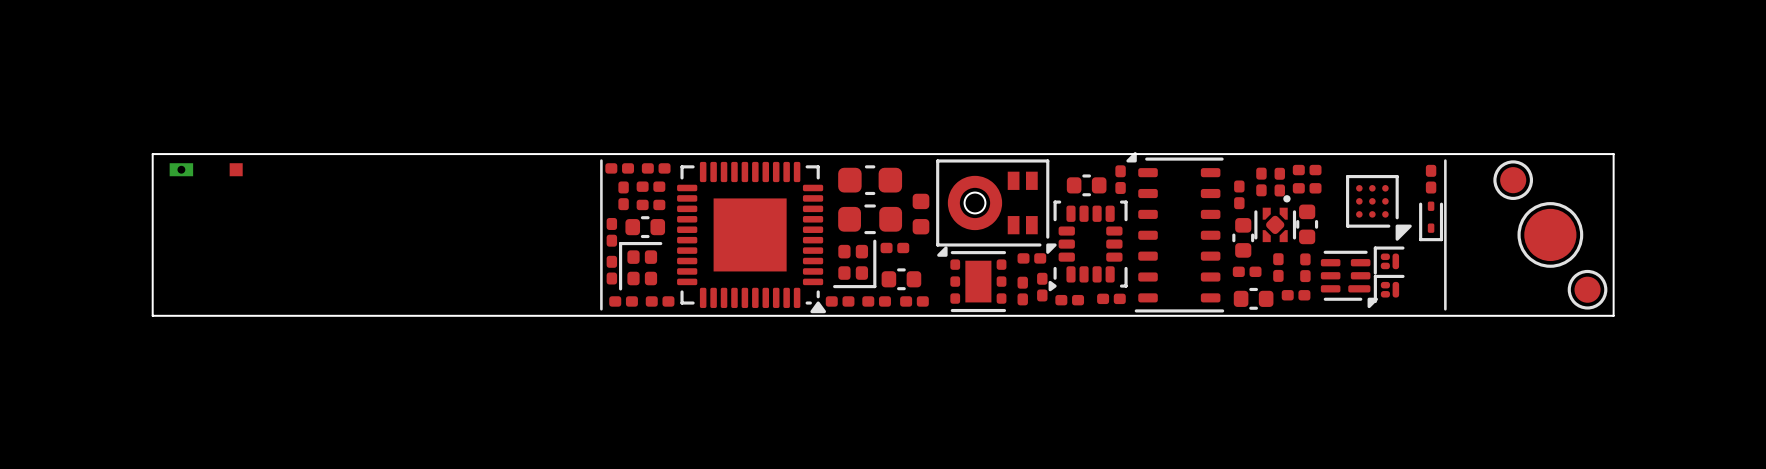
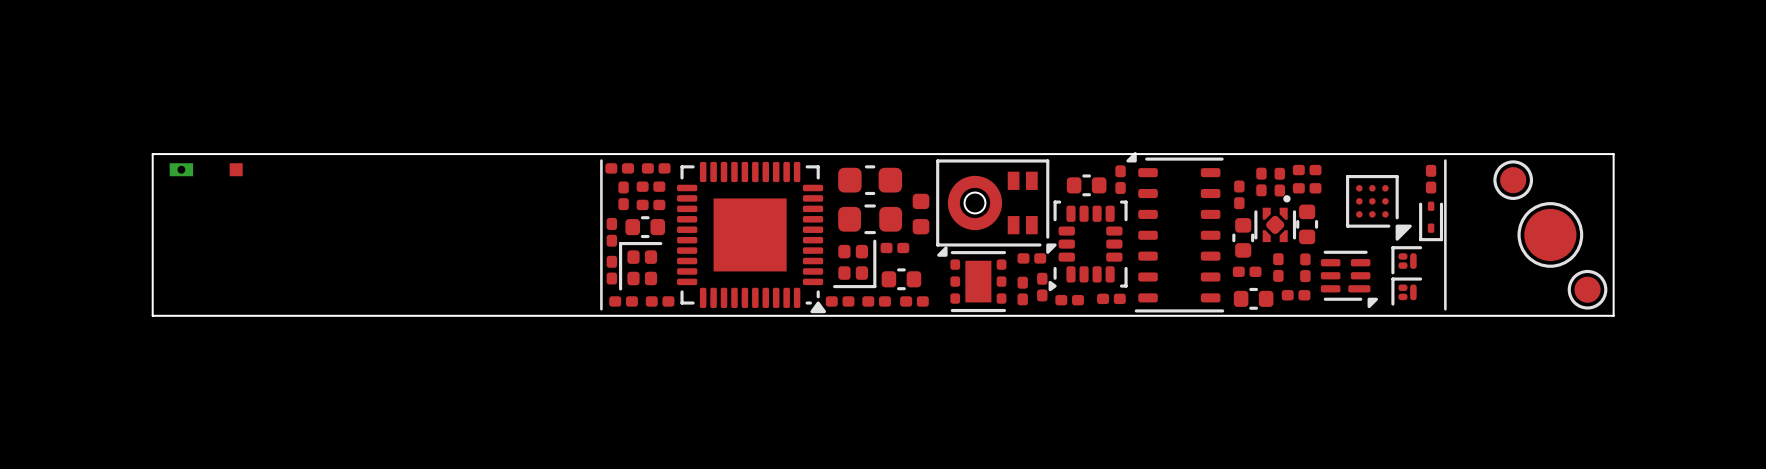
part: (1389, 260) -> none
part: none -> (1406, 260)
part: (1389, 288) -> none
part: none -> (1406, 291)

